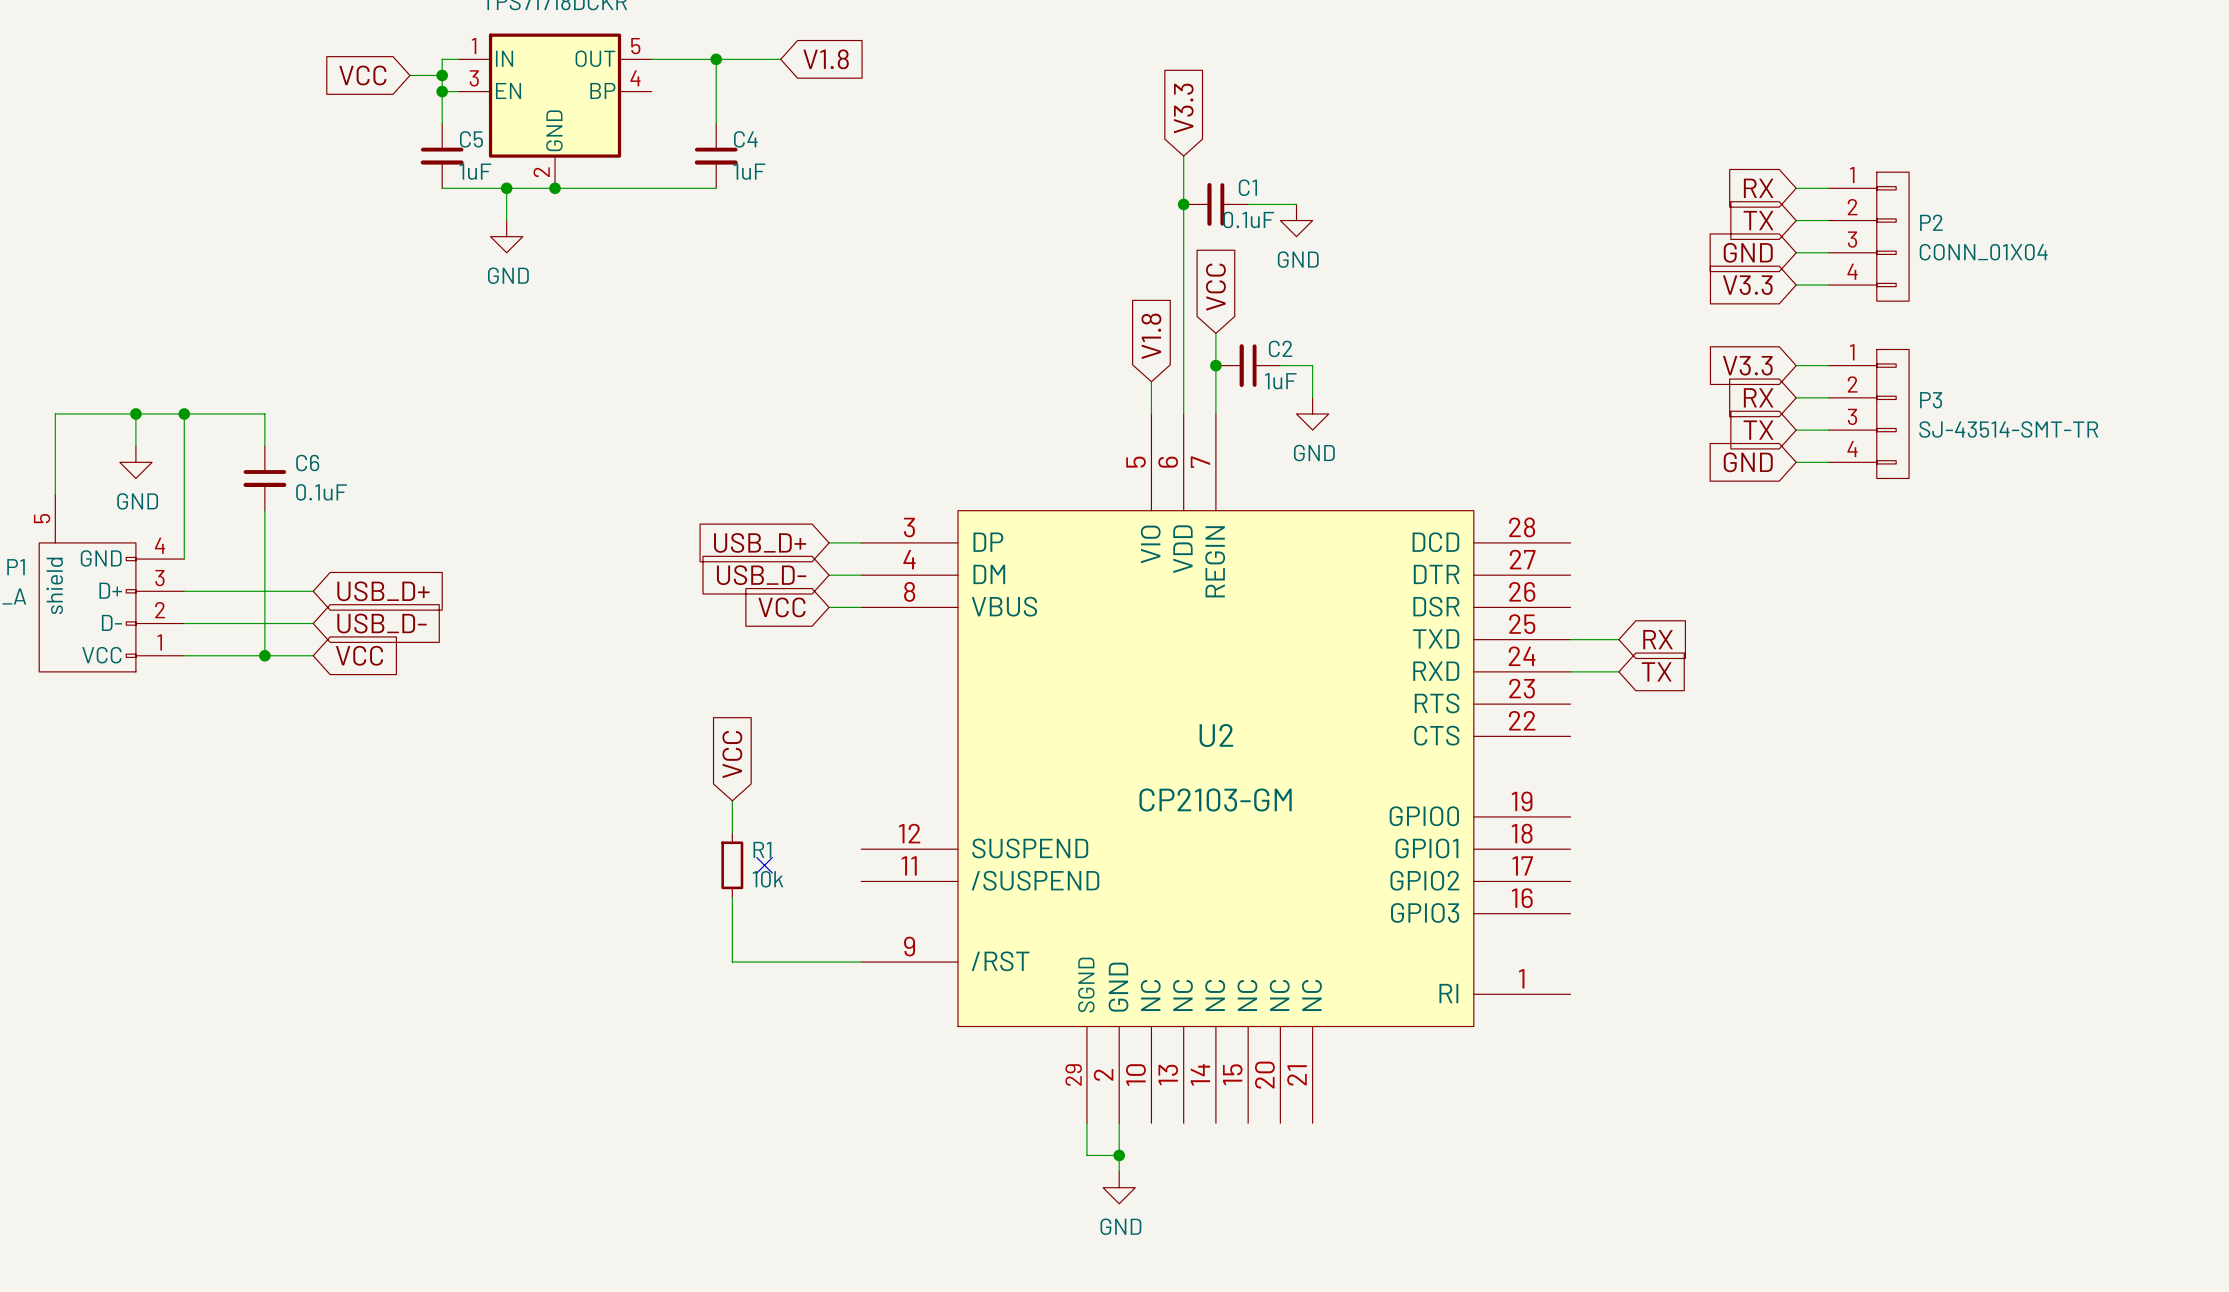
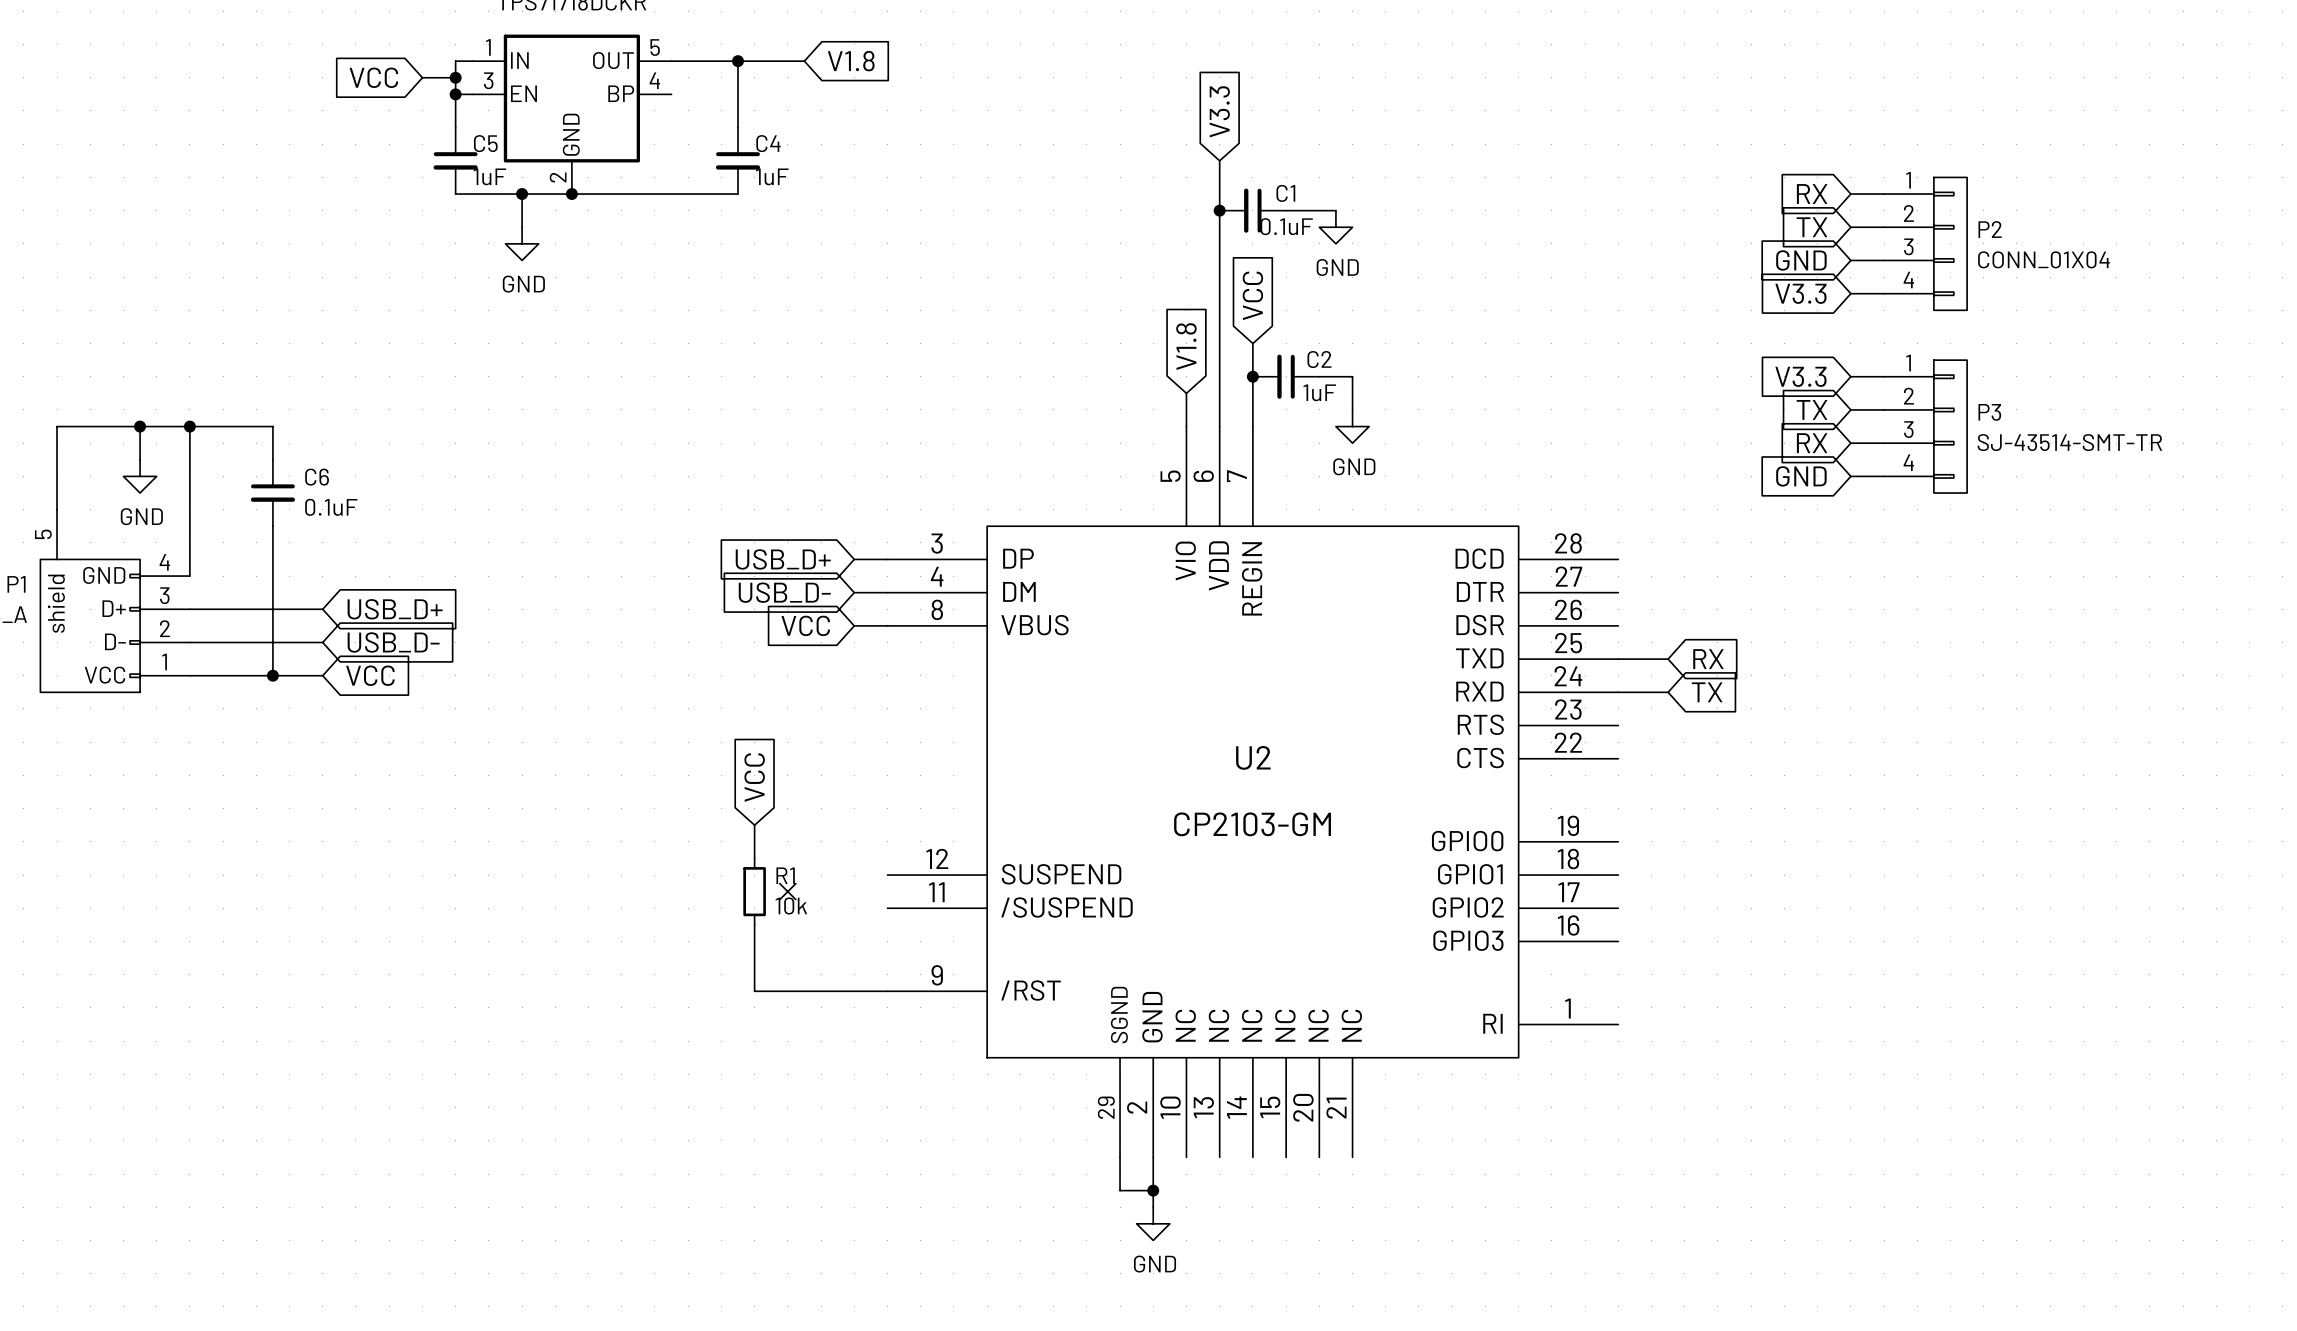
global label: RX (1758, 397) -> TX (1812, 409)
global label: TX (1758, 430) -> RX (1812, 443)

